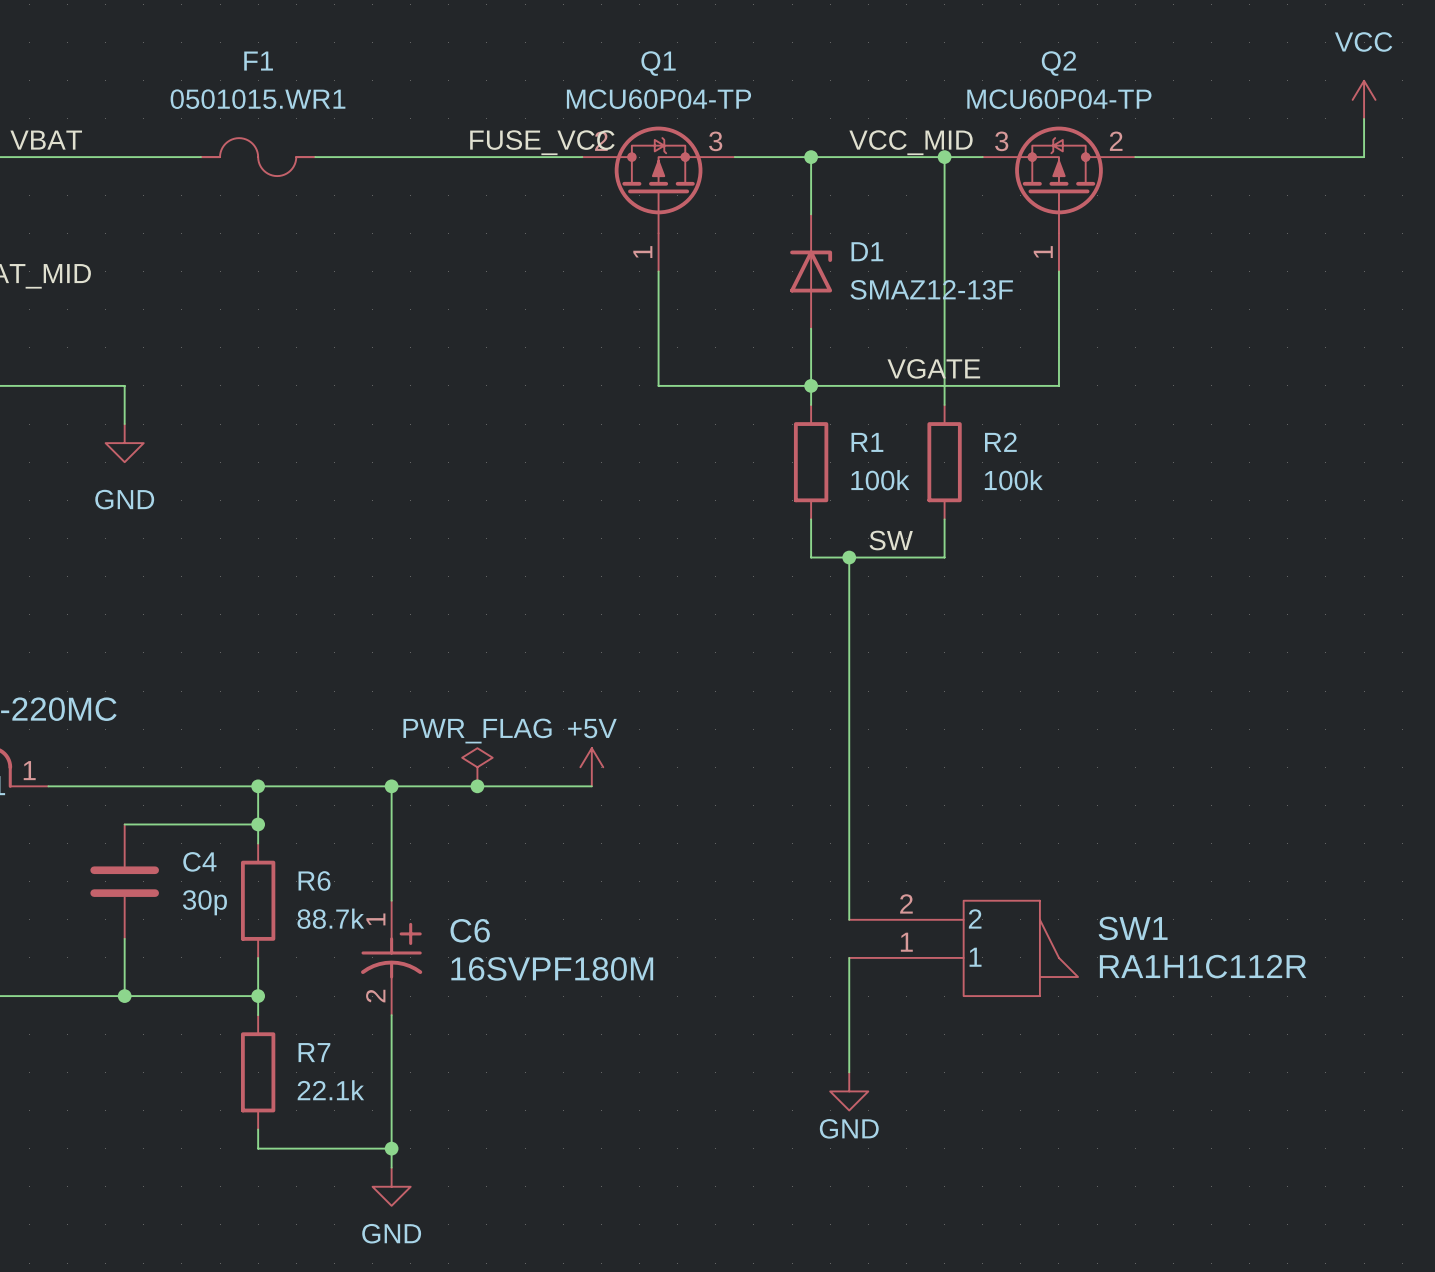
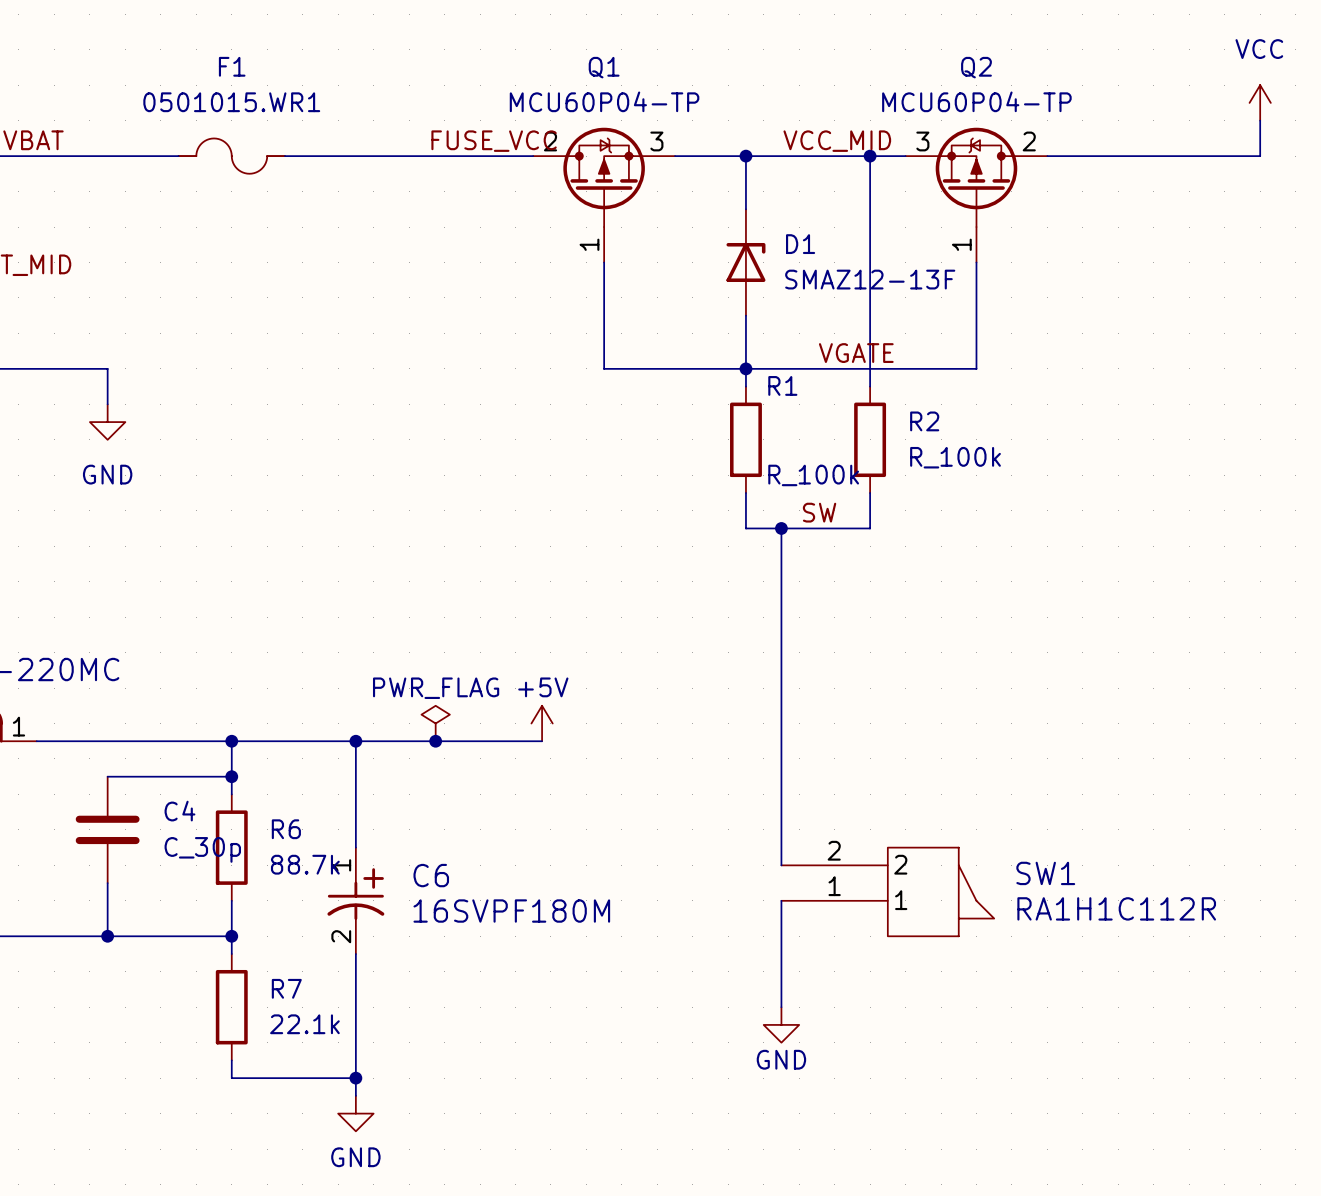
R1 name position: R1 (867, 442) -> R1 (782, 385)
R1 value: 100k (880, 480) -> R_100k (813, 475)
R2 value: 100k (1013, 480) -> R_100k (955, 457)
C4 value: 30p (204, 902) -> C_30p (202, 849)

